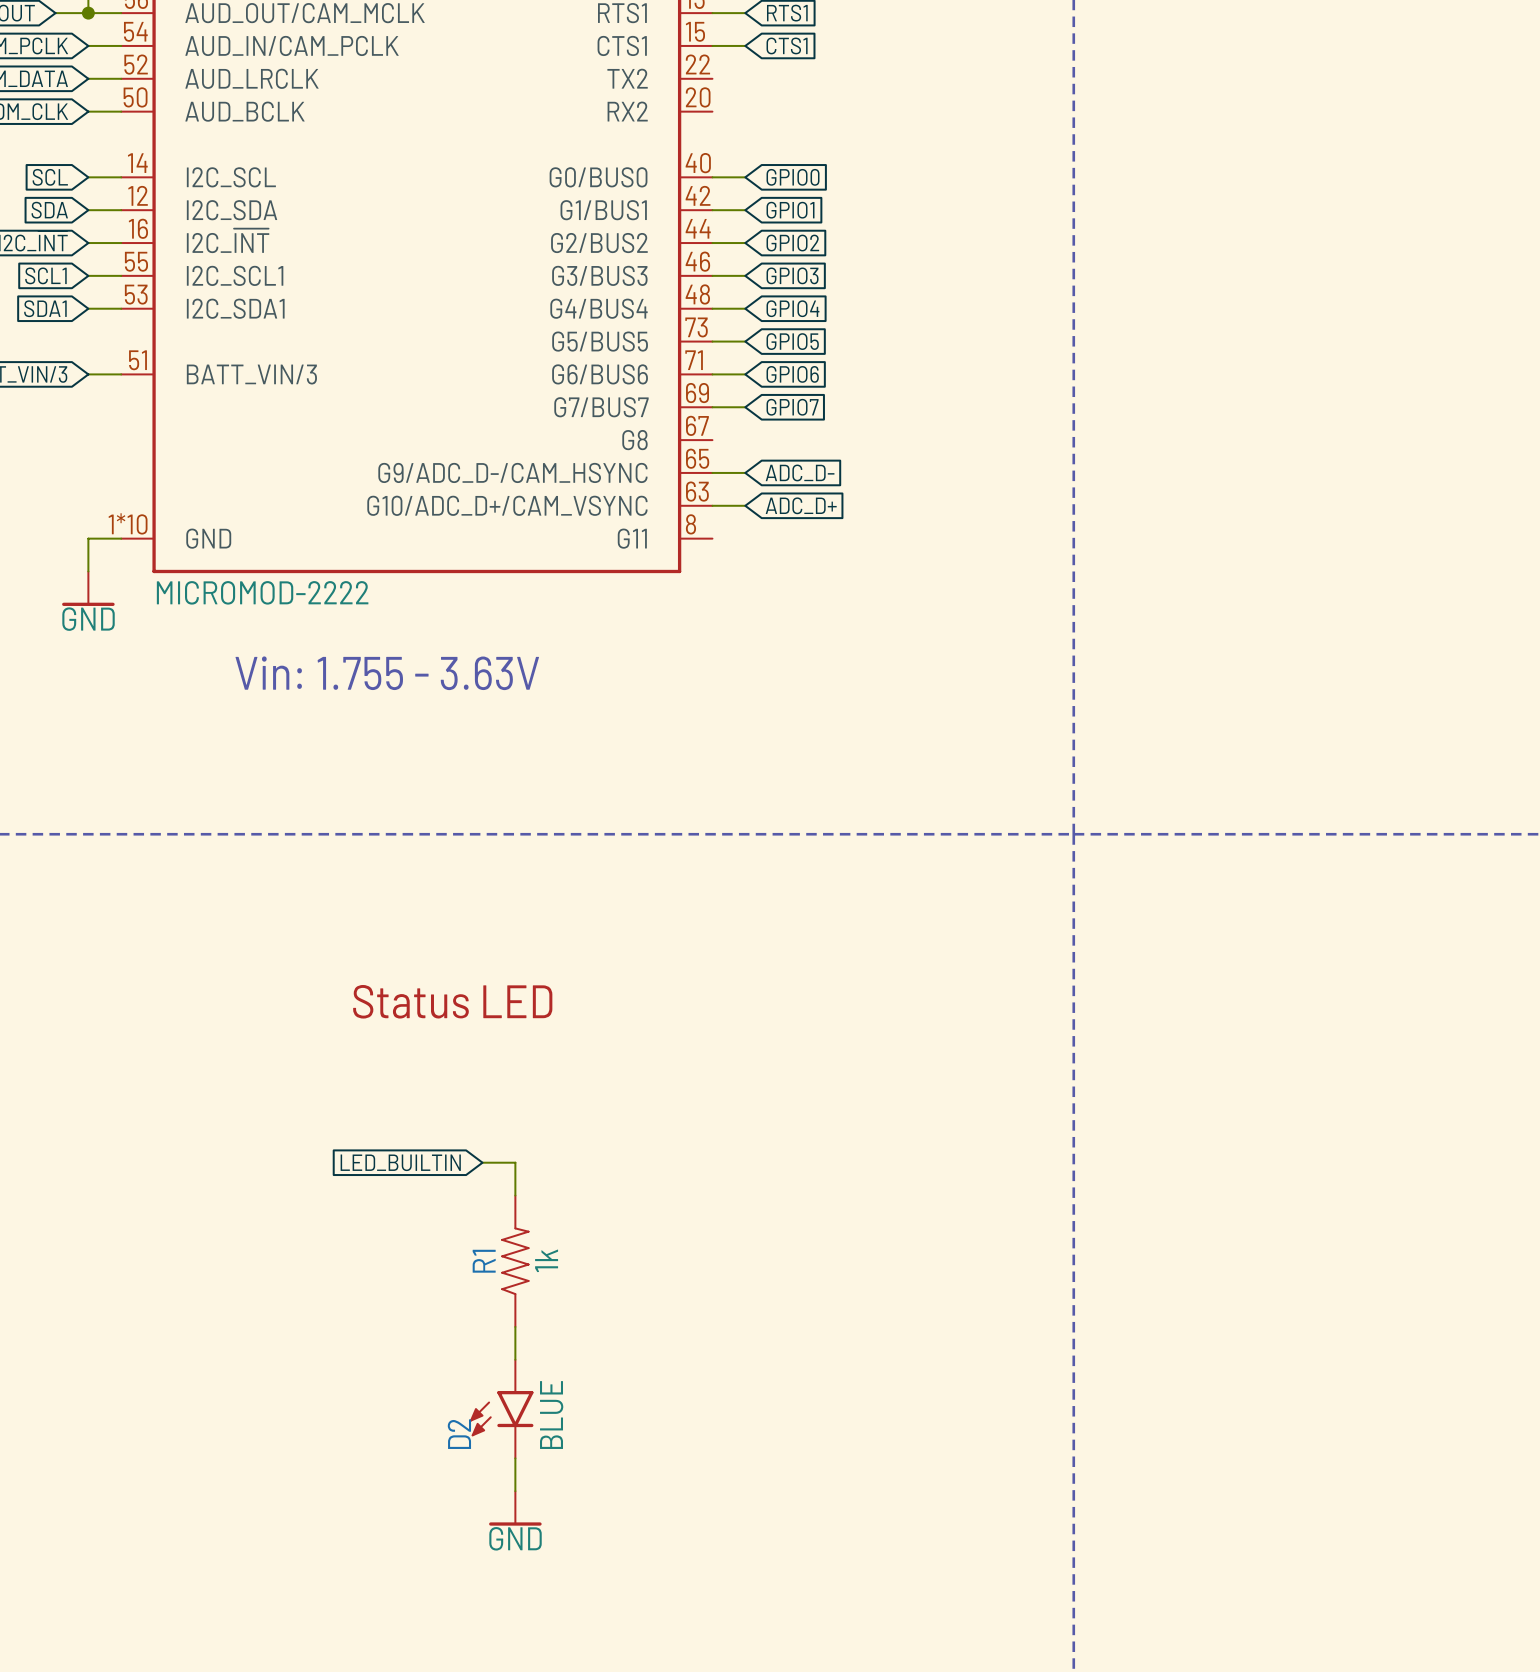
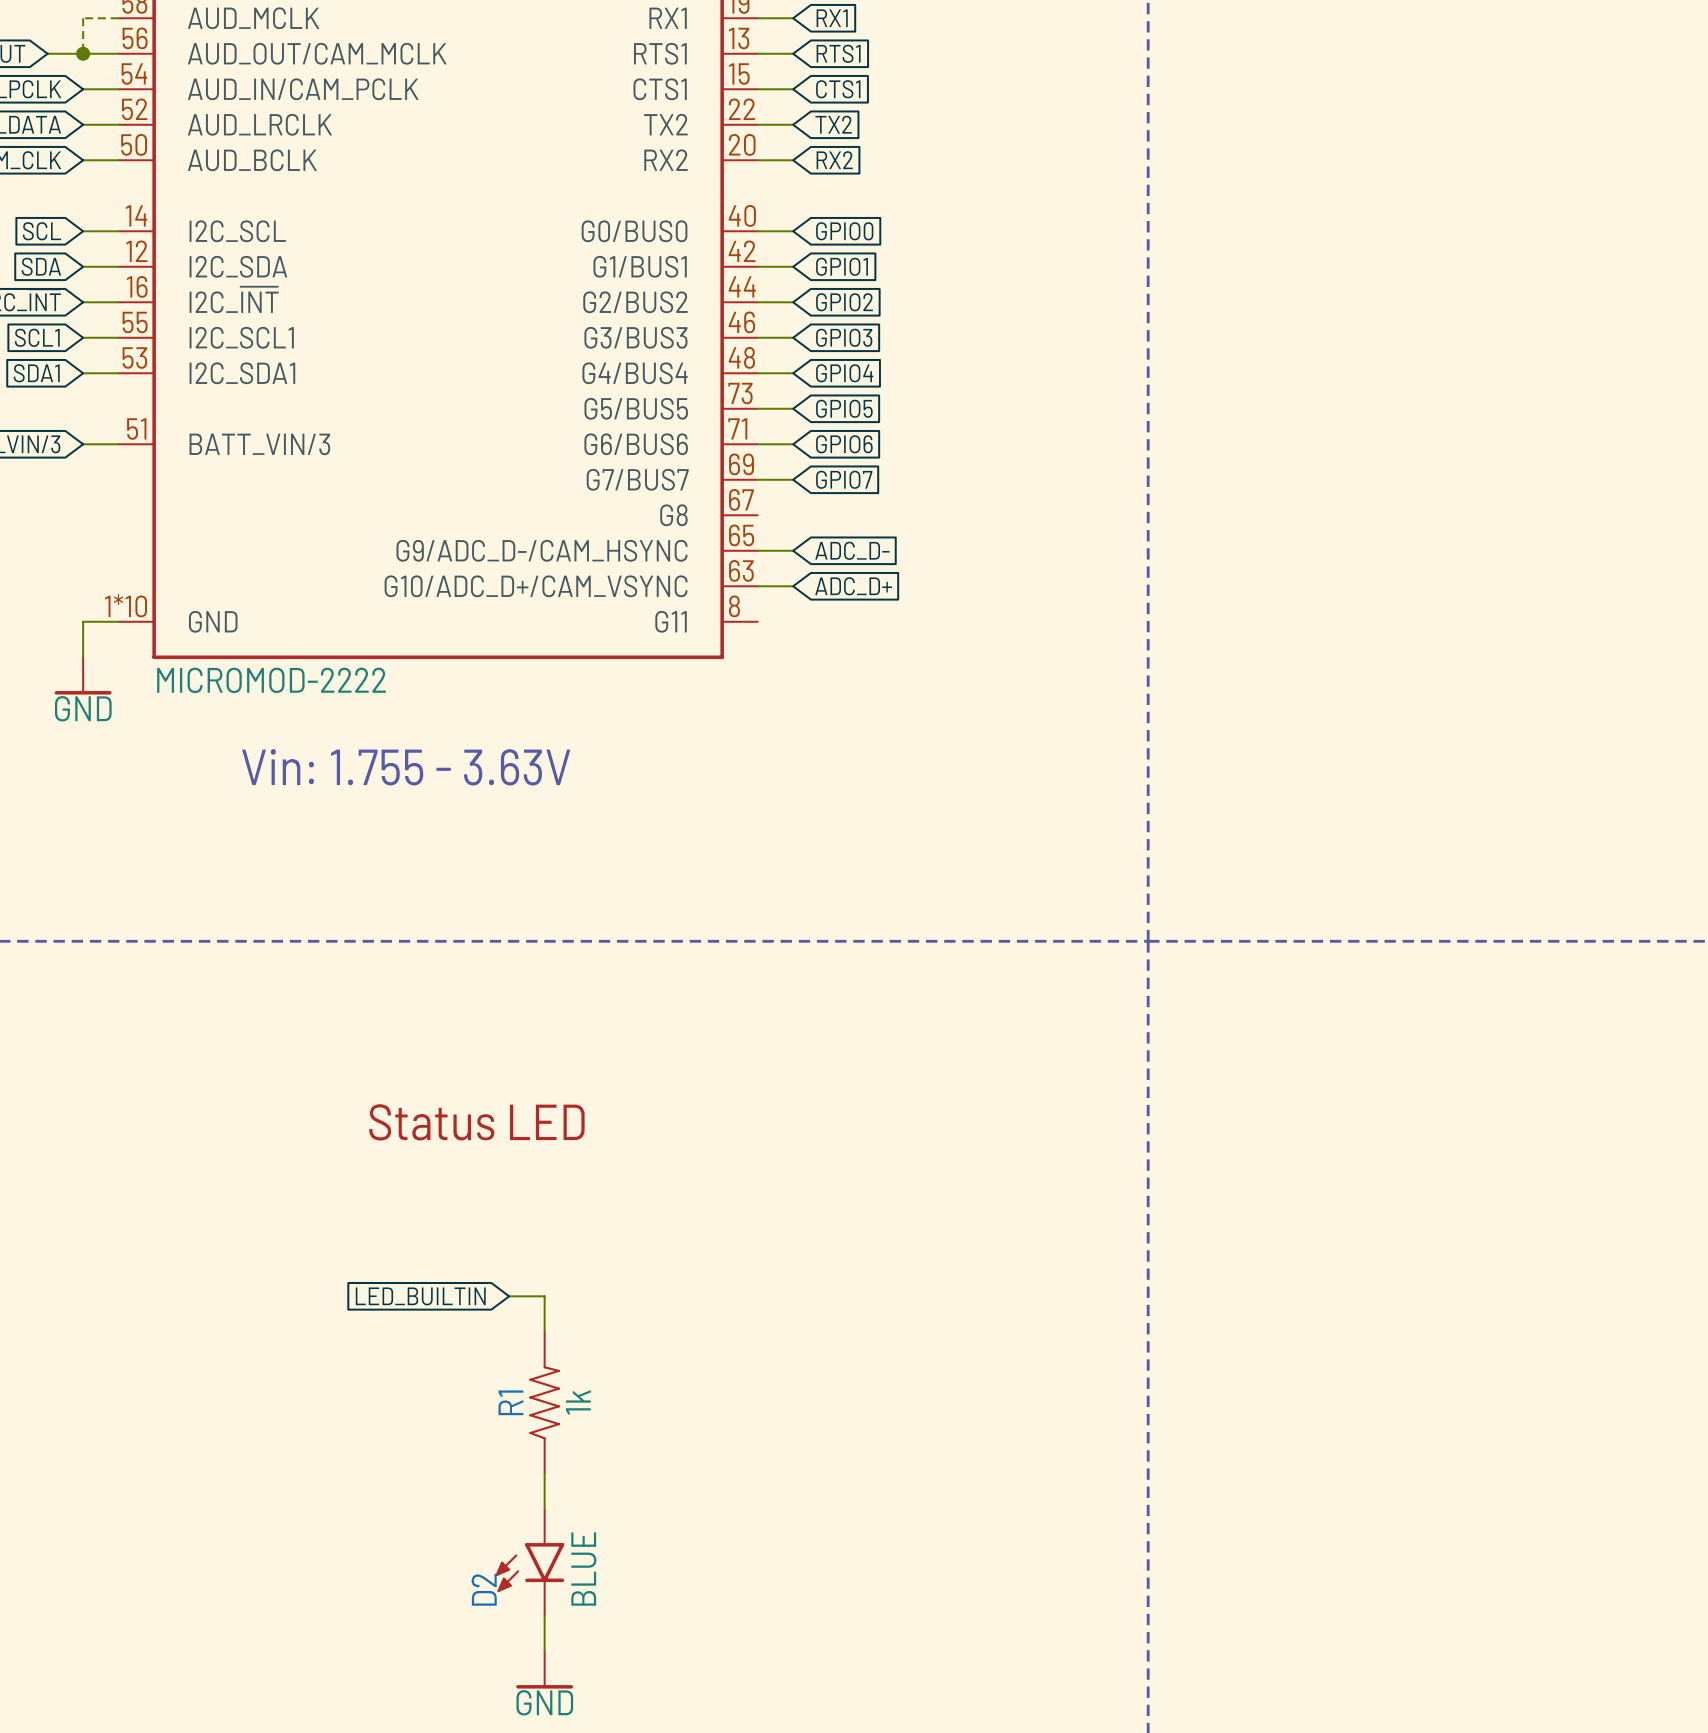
wire: none -> (757, 124) (793, 124)
global label: none -> TX2 (833, 124)
wire: none -> (757, 160) (793, 160)
global label: none -> RX2 (834, 160)

